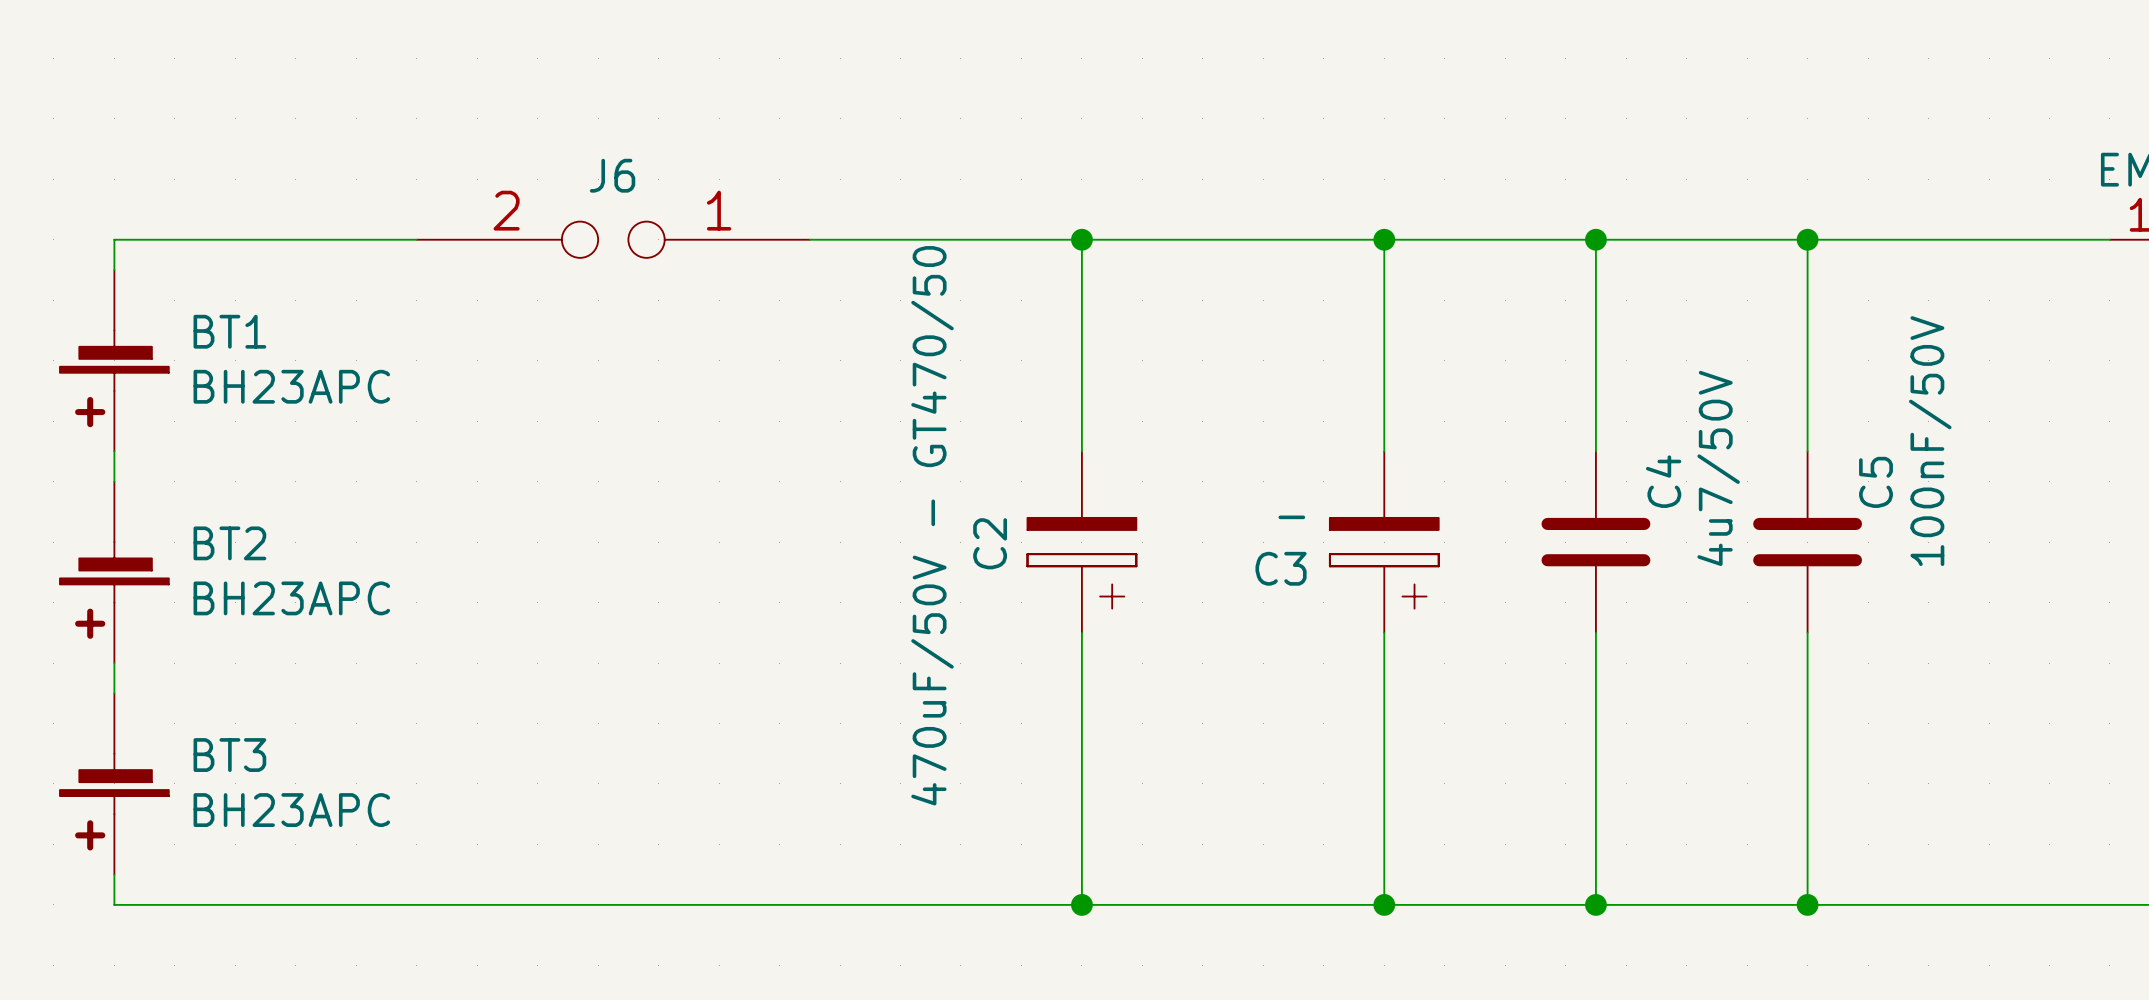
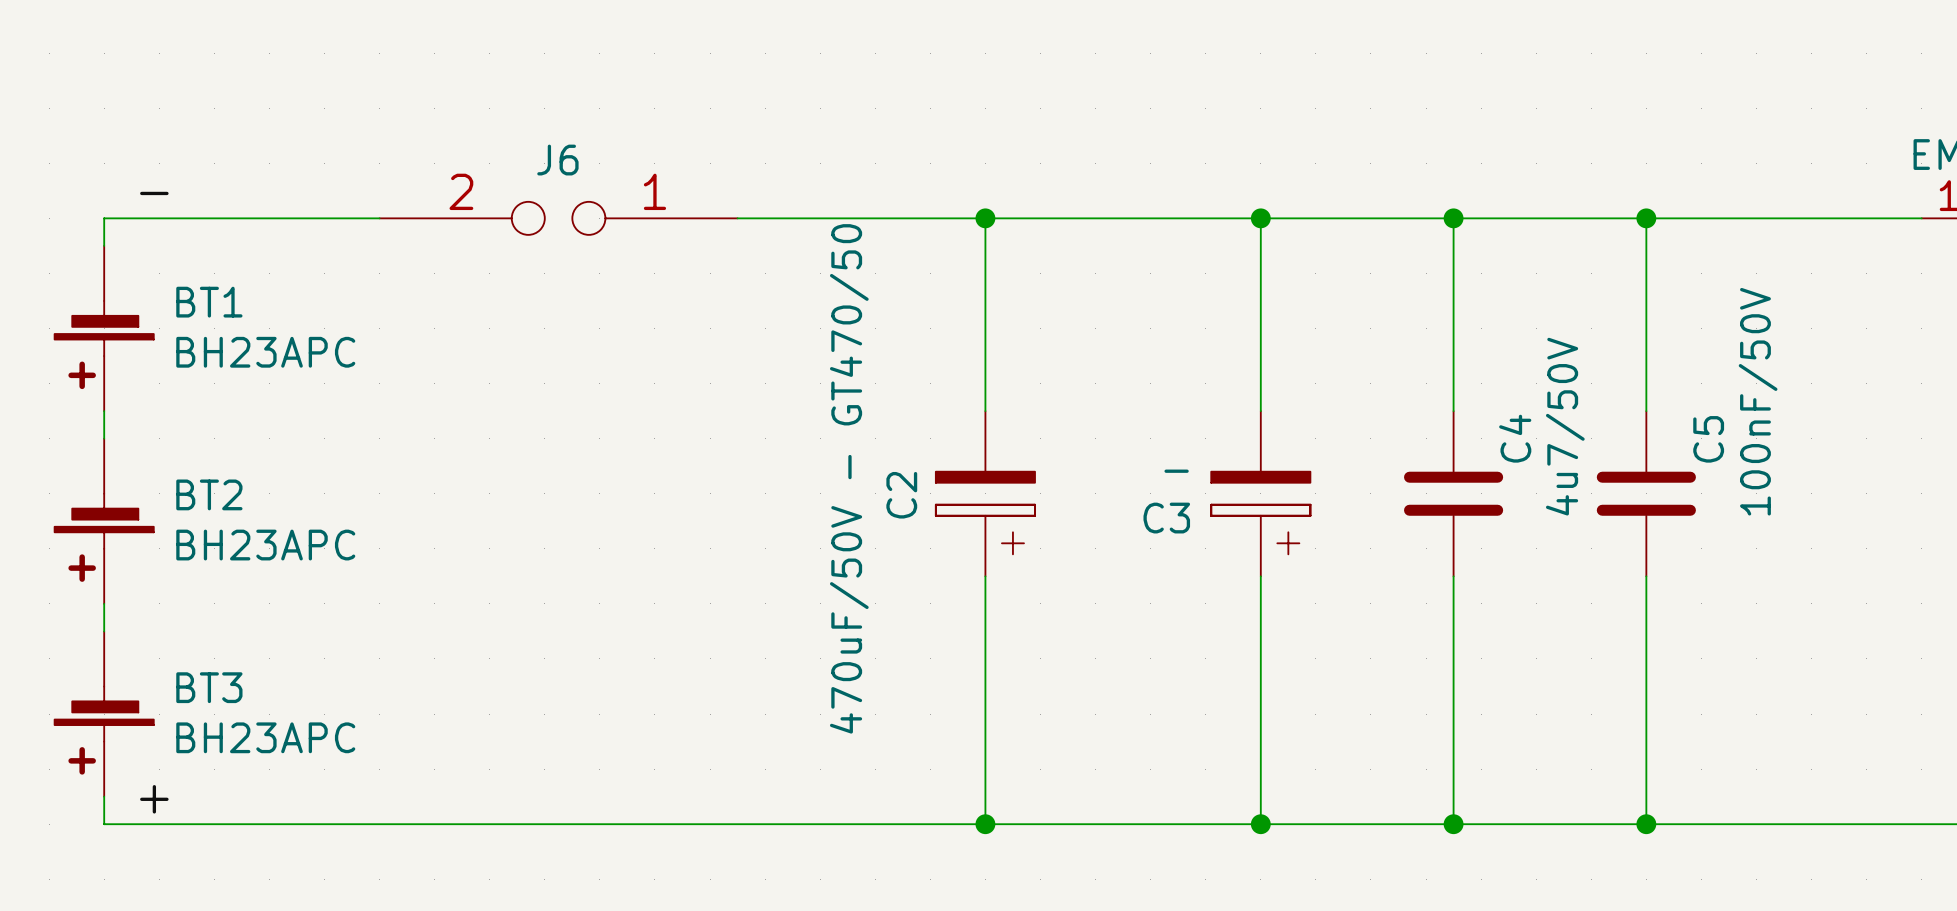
label: none -> - (154, 193)
label: none -> + (154, 799)

